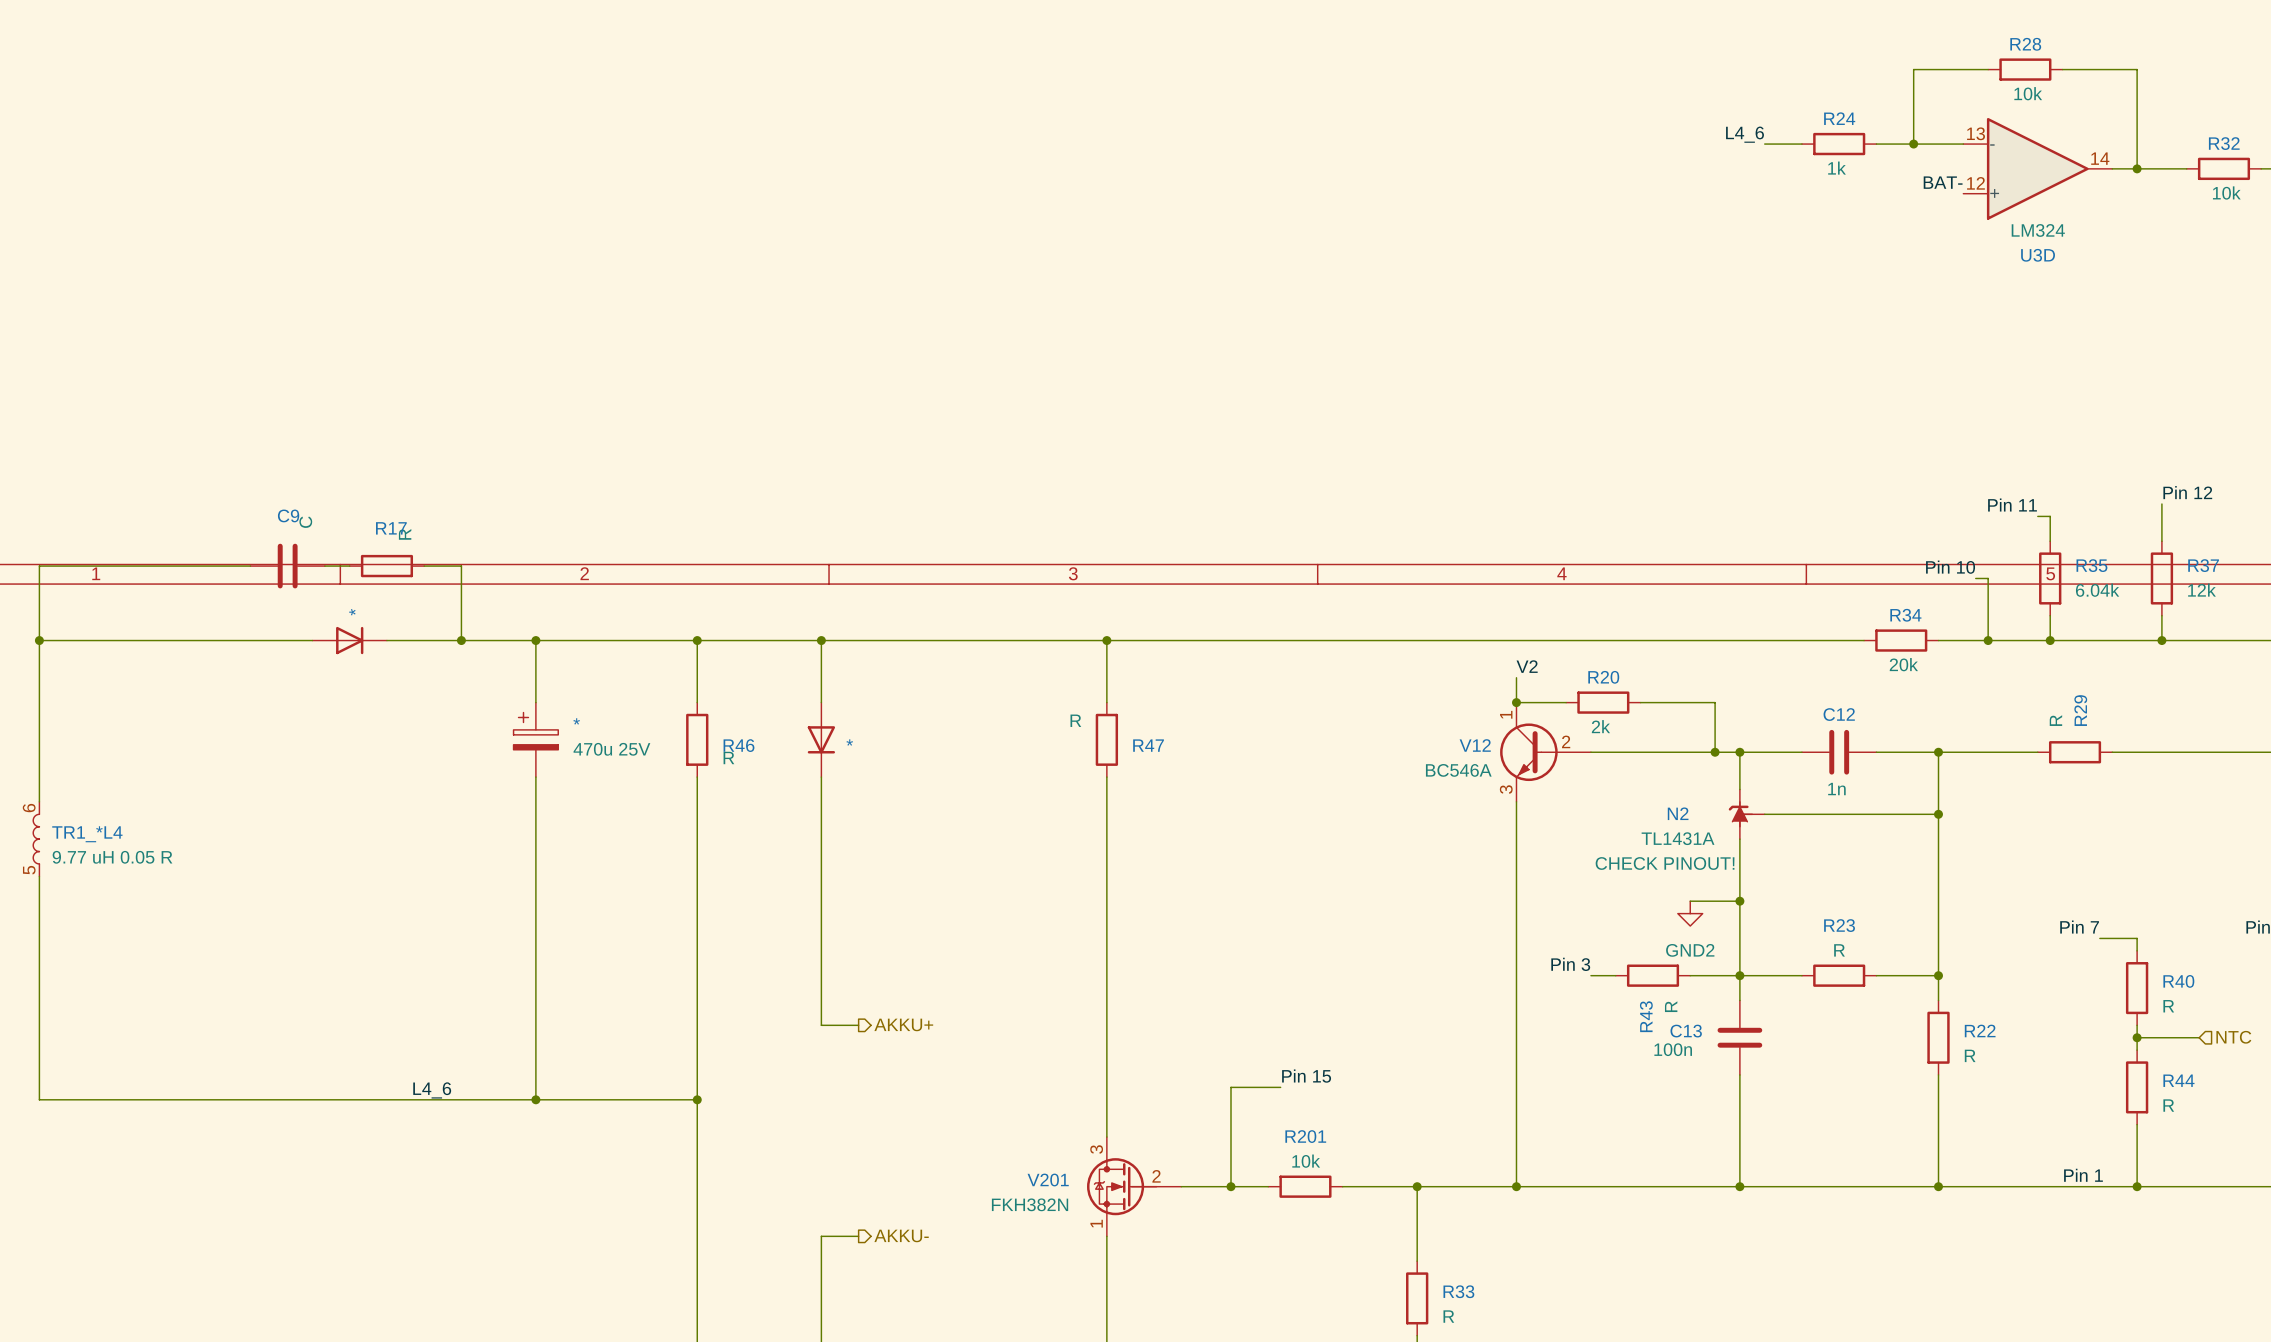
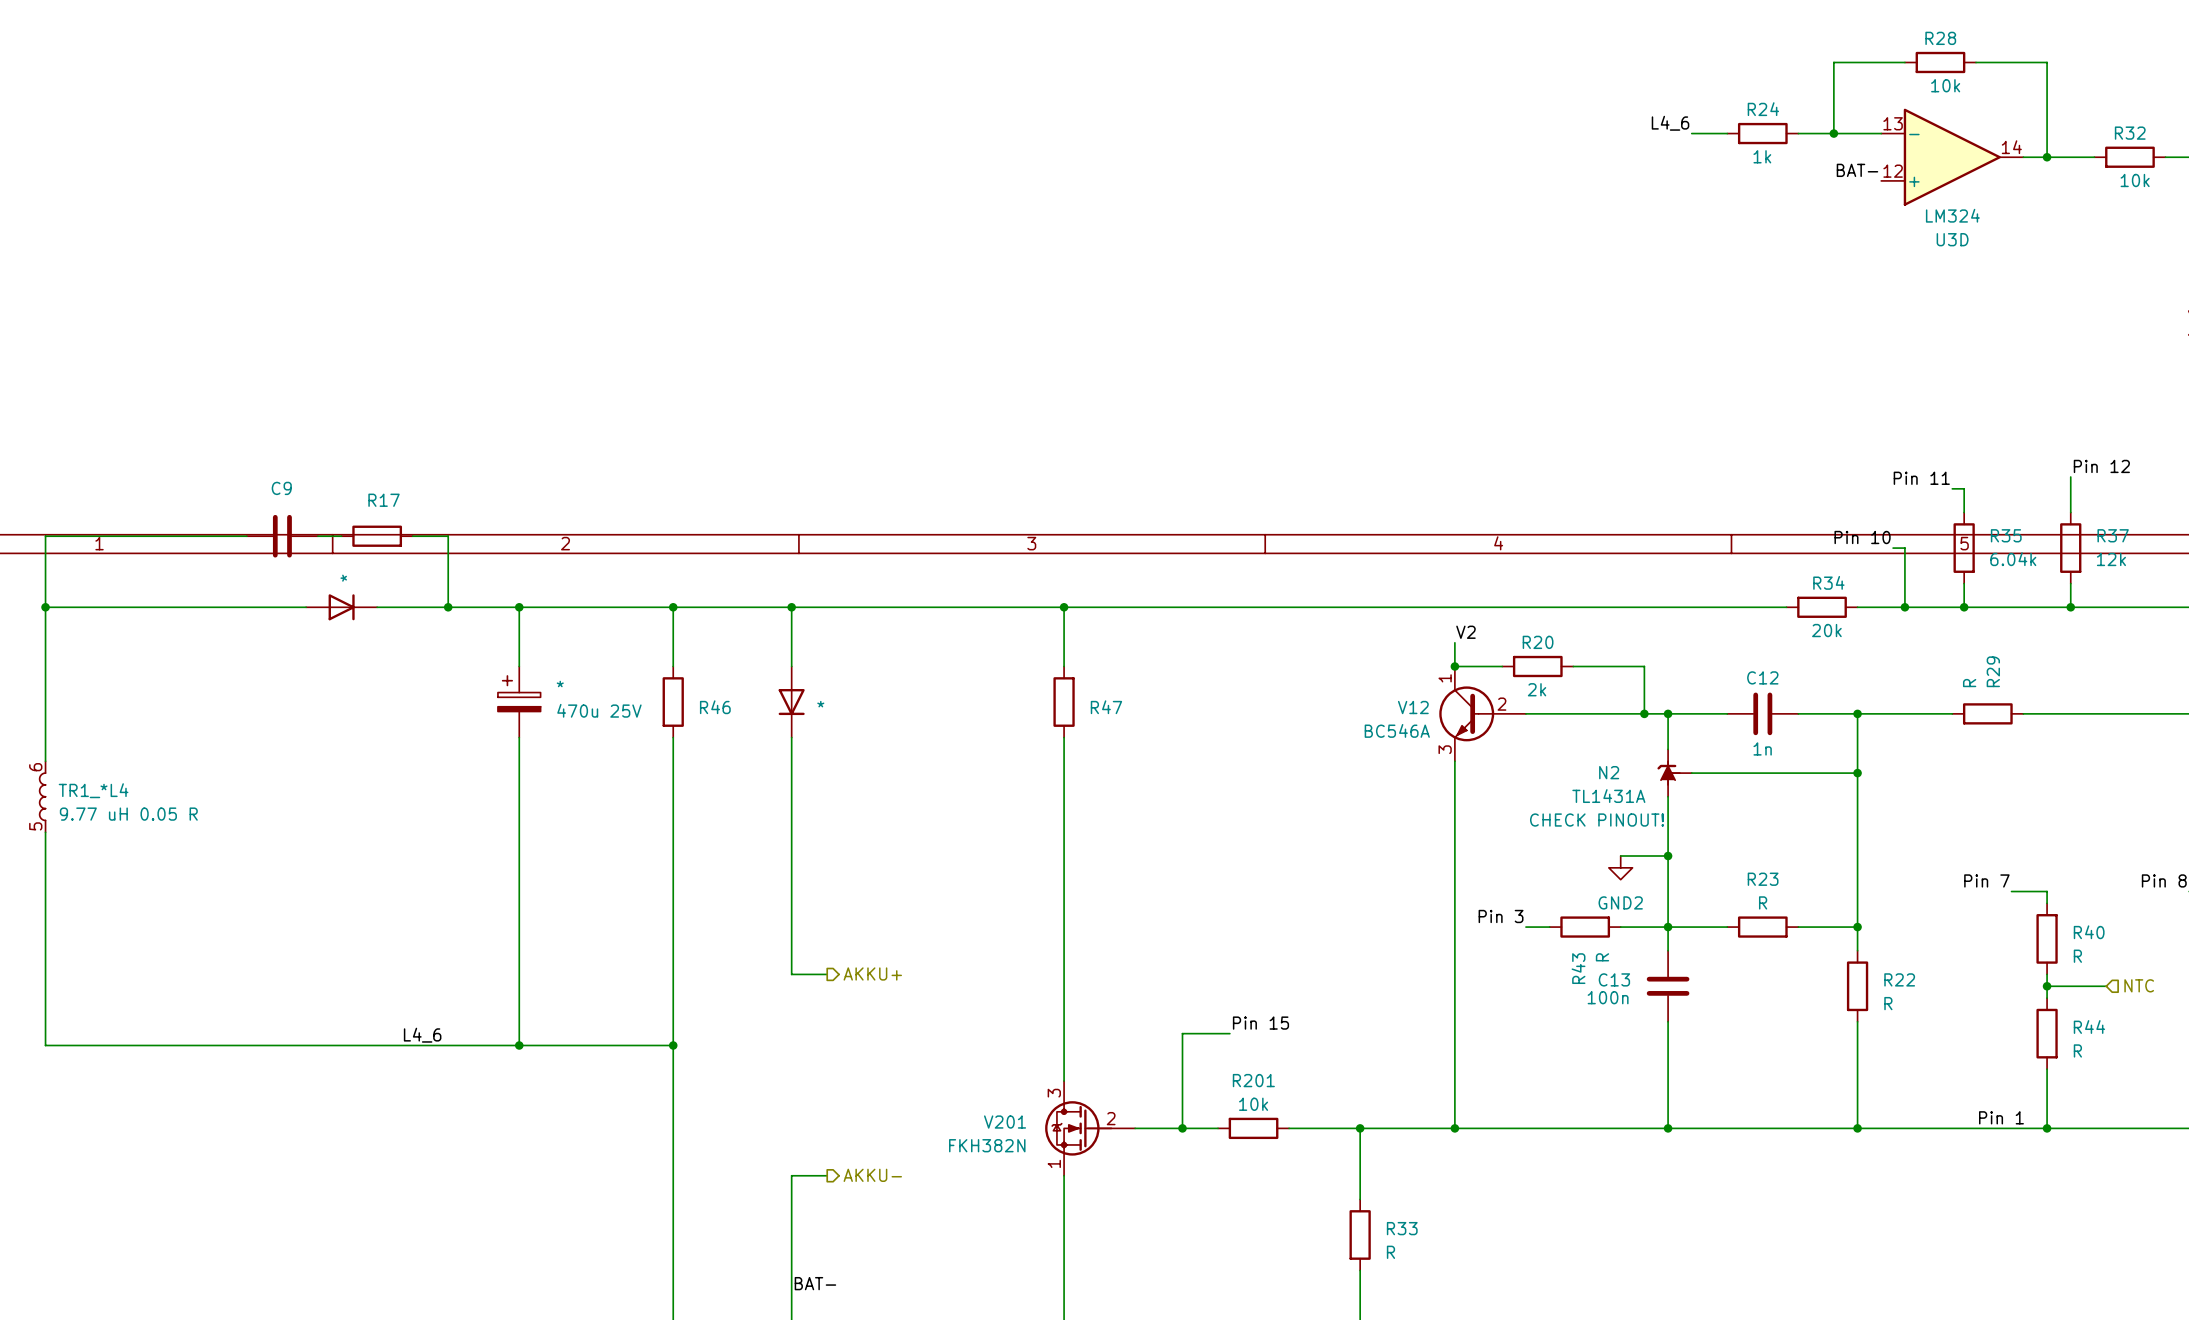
C9 value: C (305, 522) -> none
R17 value: R (405, 534) -> none
R47 value: R (1075, 720) -> none
R46 value: R (728, 757) -> none

